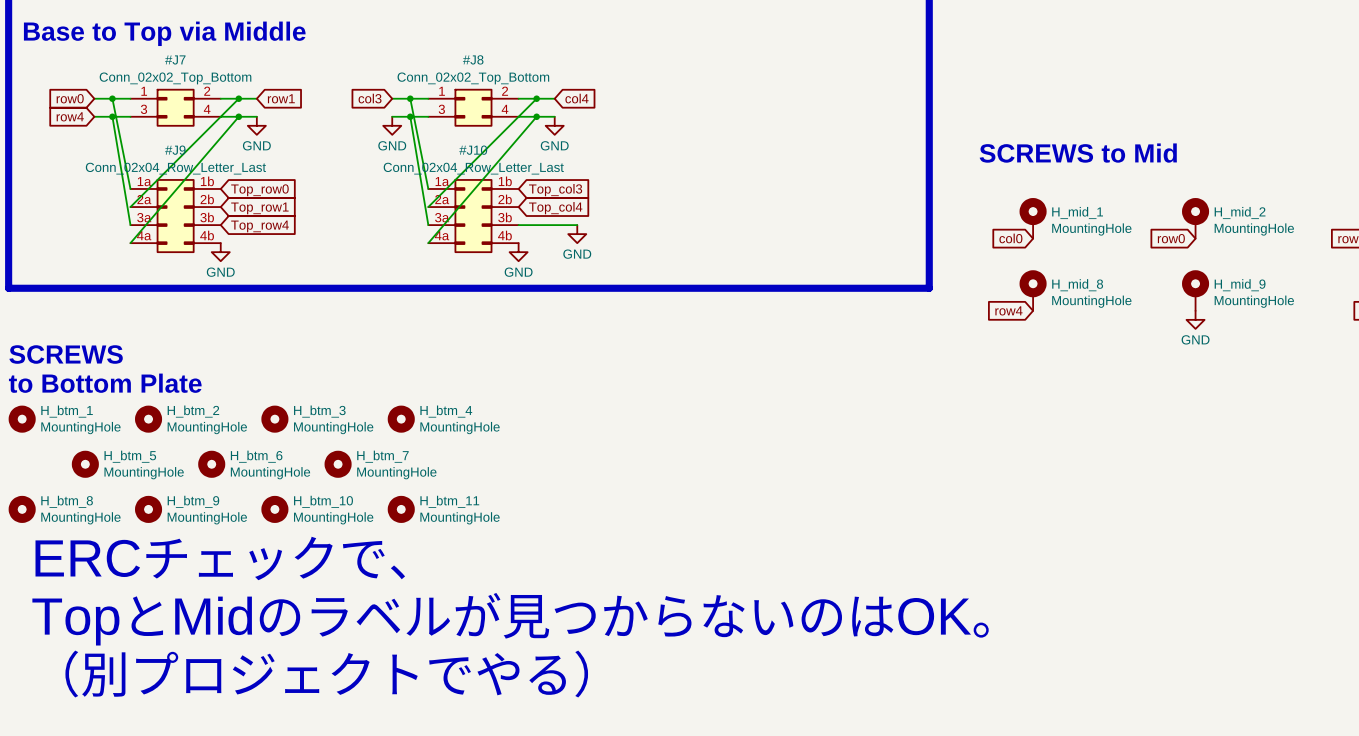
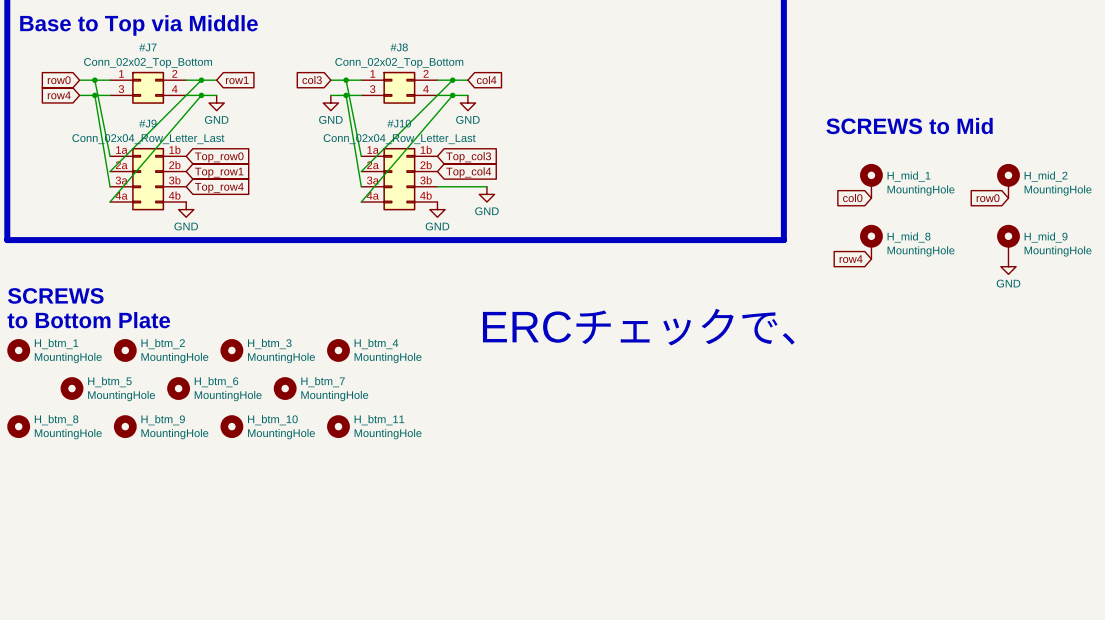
text: none -> ERCチェックで、 (638, 327)
text: ERCチェックで、 (220, 558) -> none
text: TopとMidのラベルが見つからないのはOK。 (510, 619) -> none
text: （別プロジェクトでやる） (326, 674) -> none

